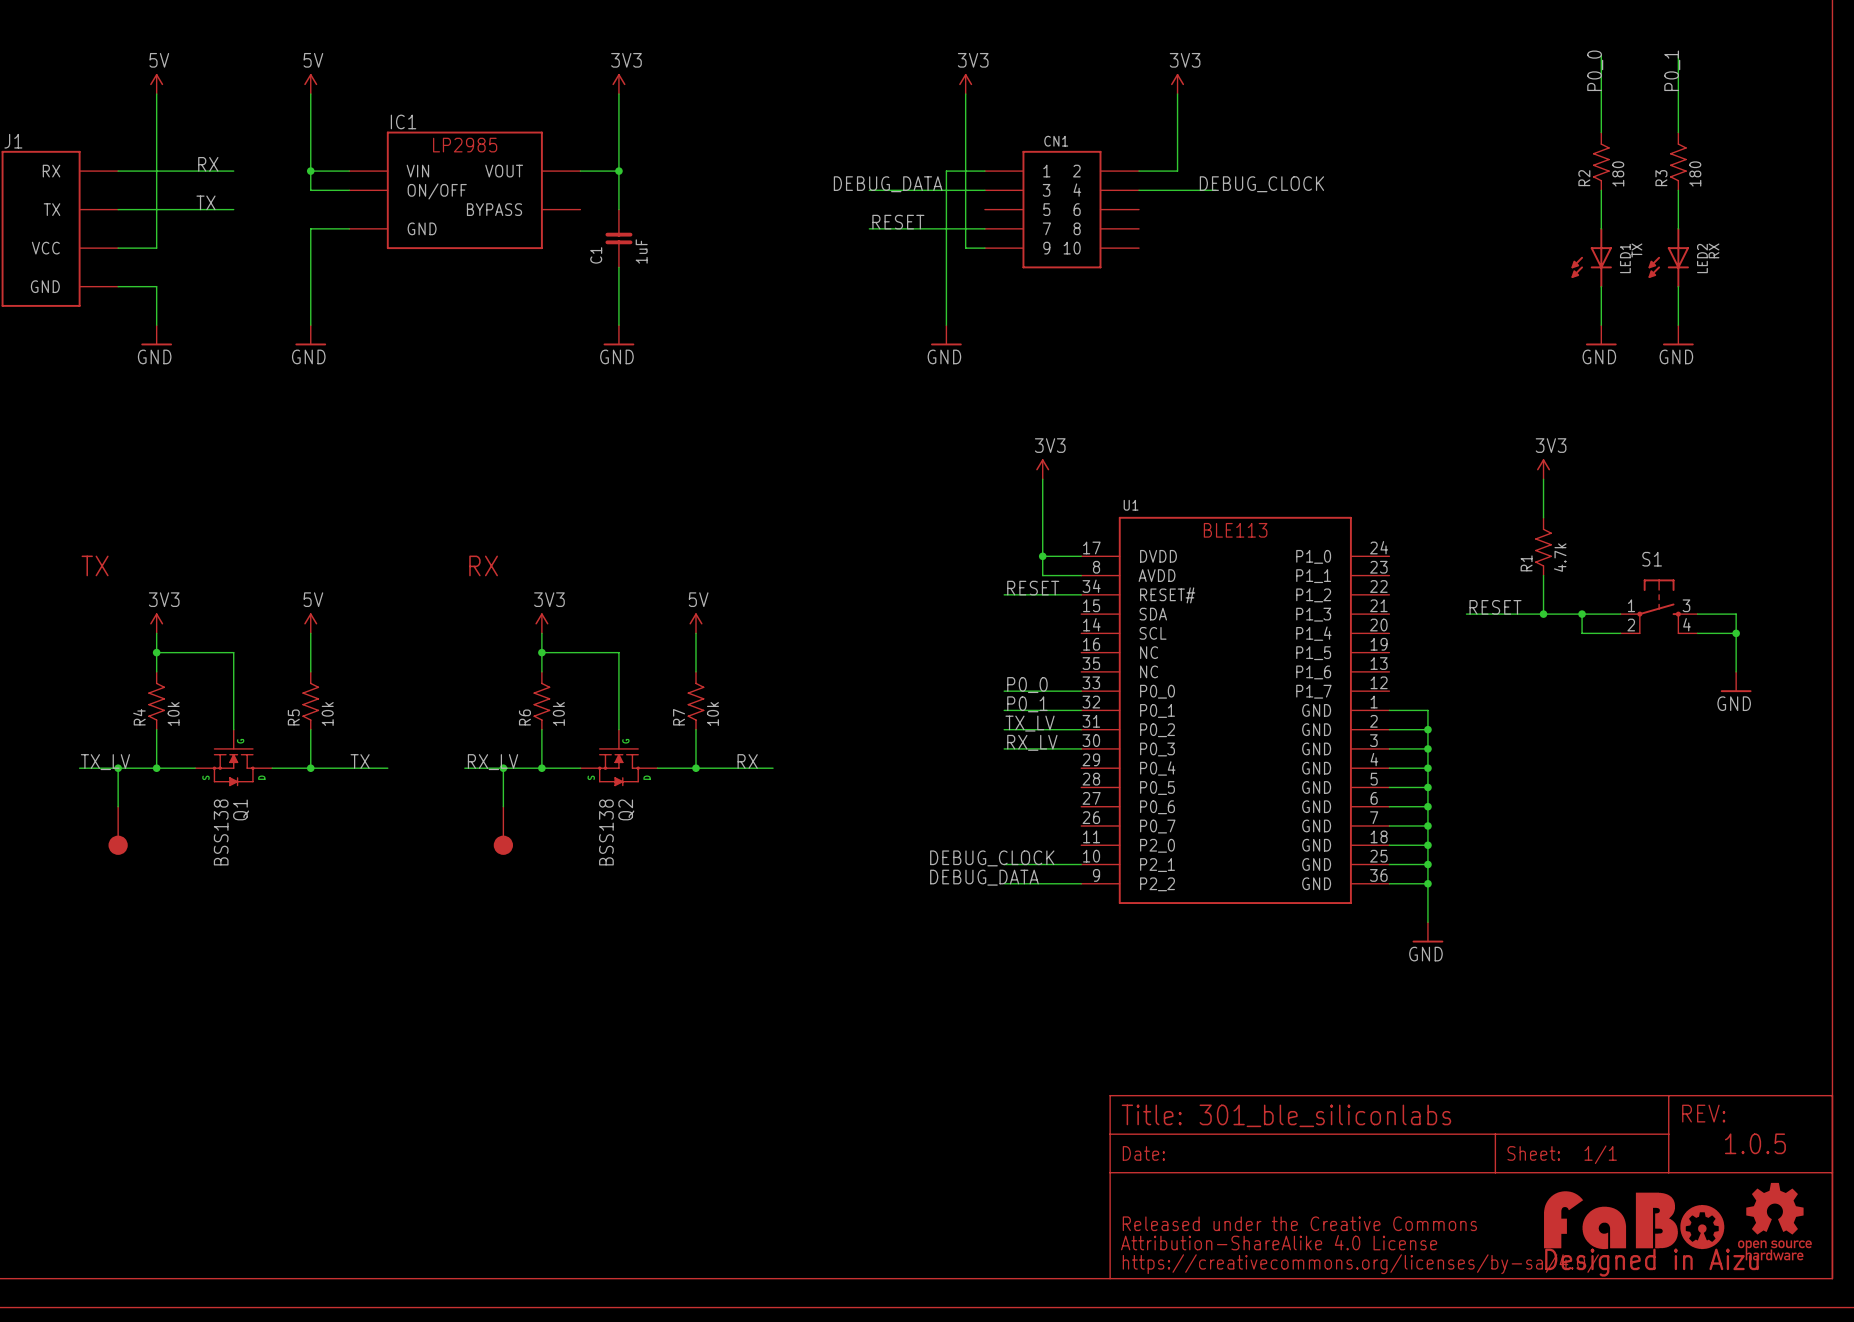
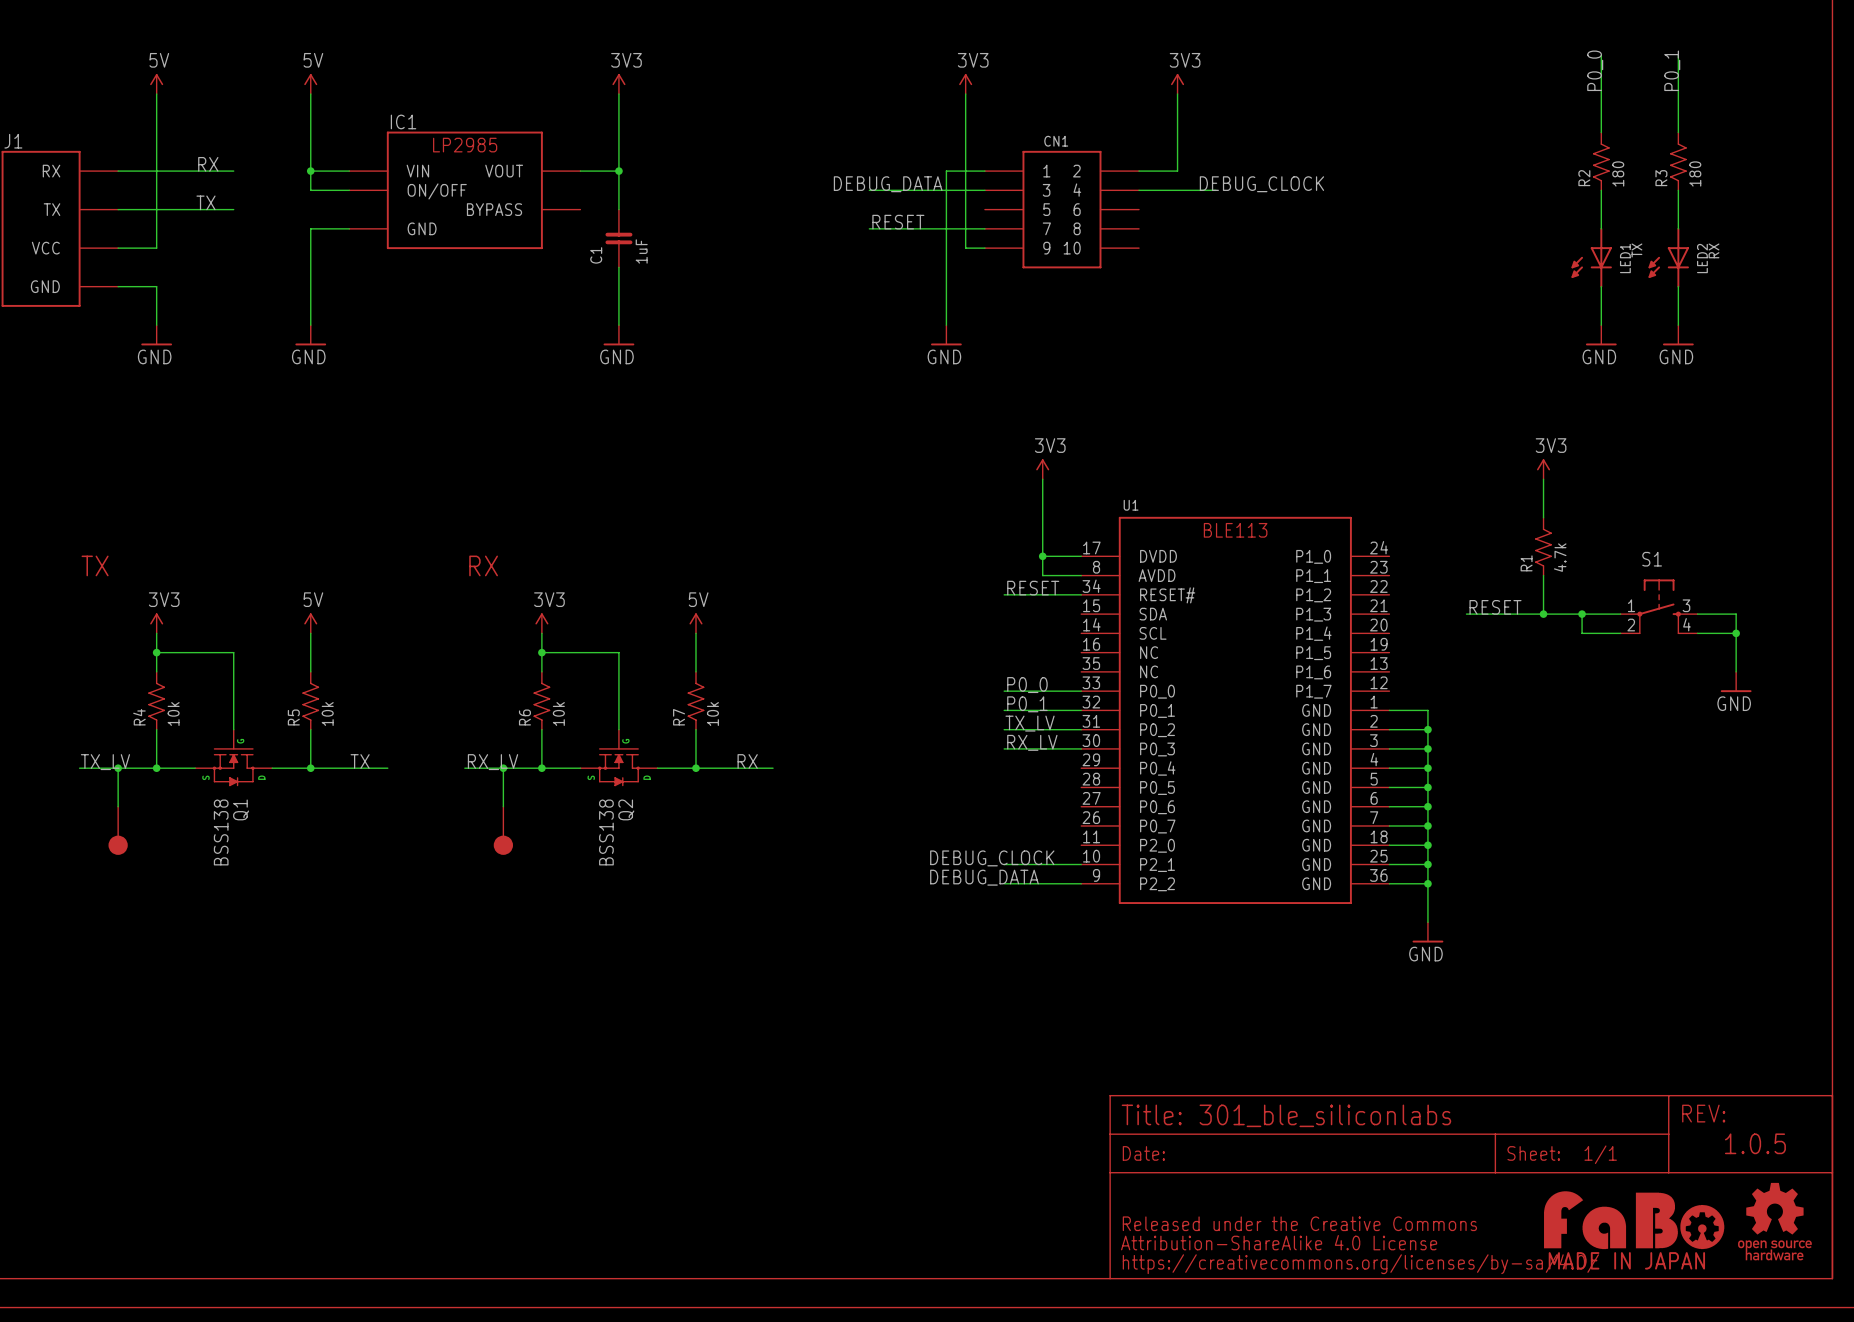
part text: none -> MADE IN JAPAN (1626, 1260)
part text: Designed in Aizu (1651, 1262) -> none

